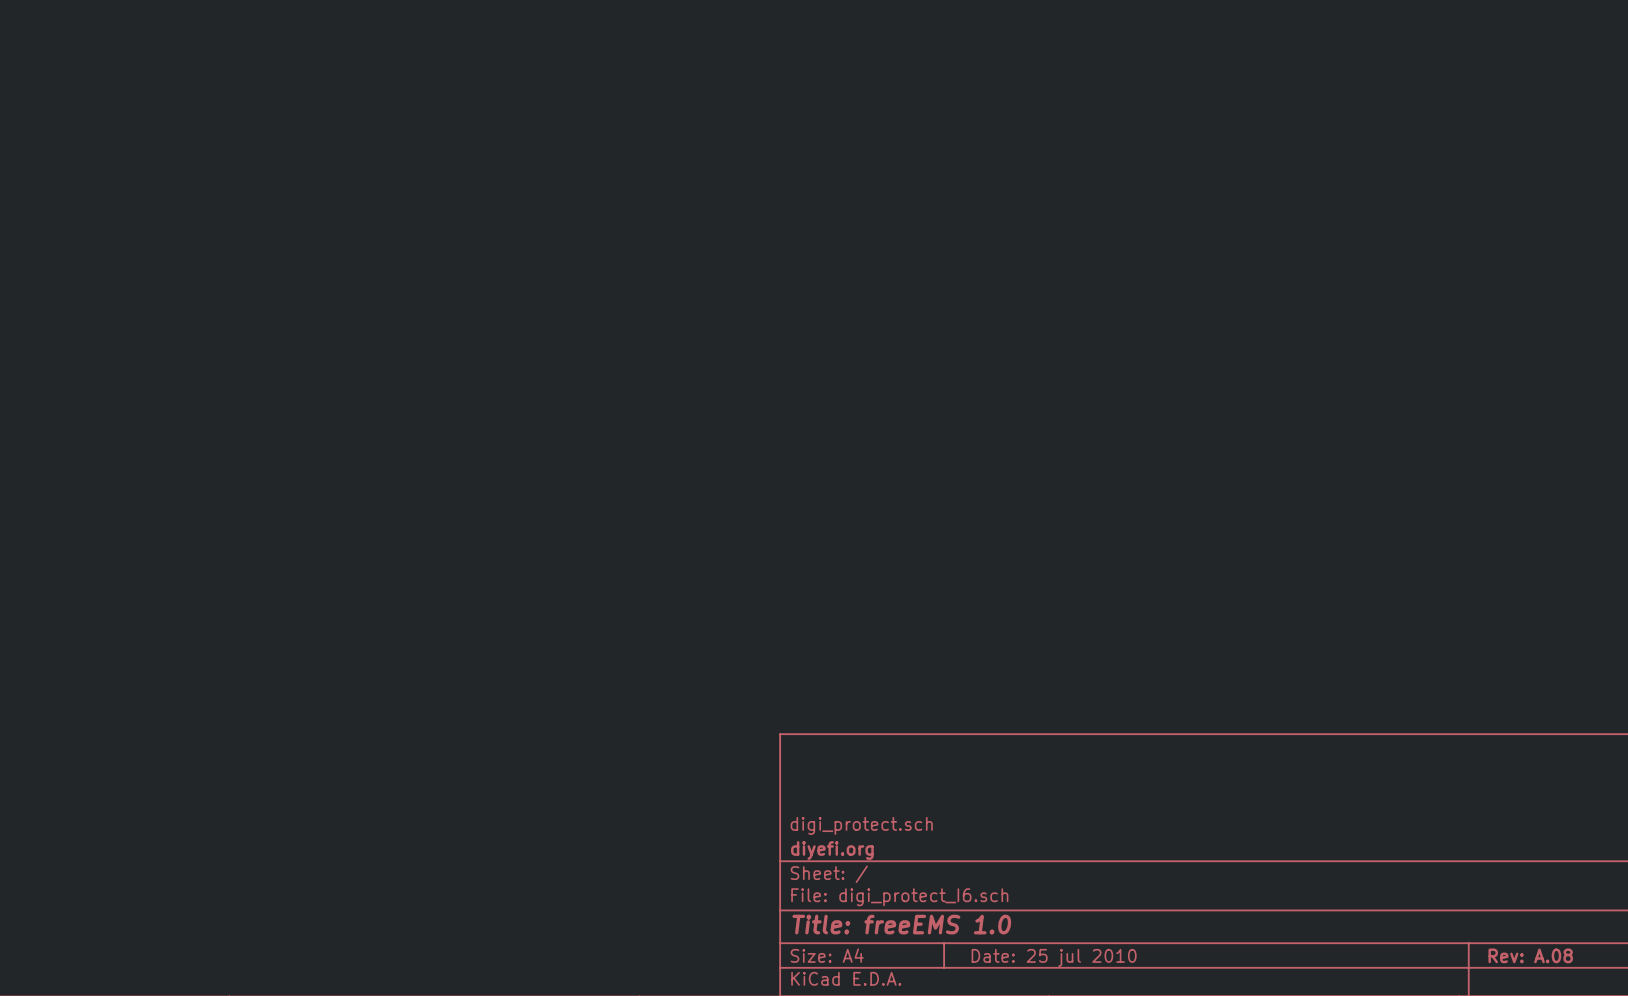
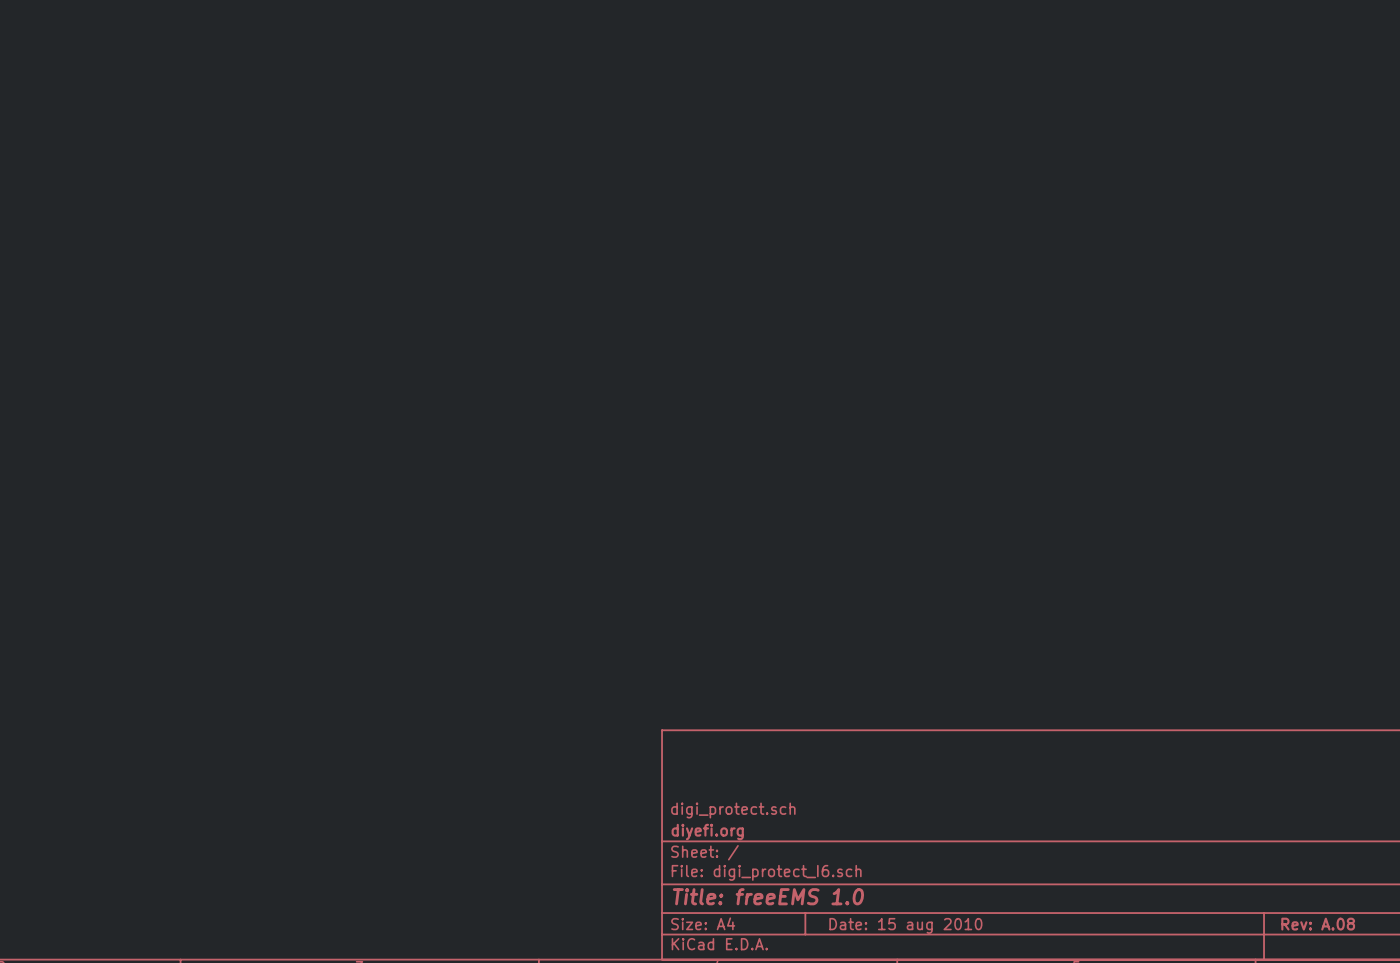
title block: Date: 25 jul 2010 (1054, 957) -> Date: 15 aug 2010 (905, 925)

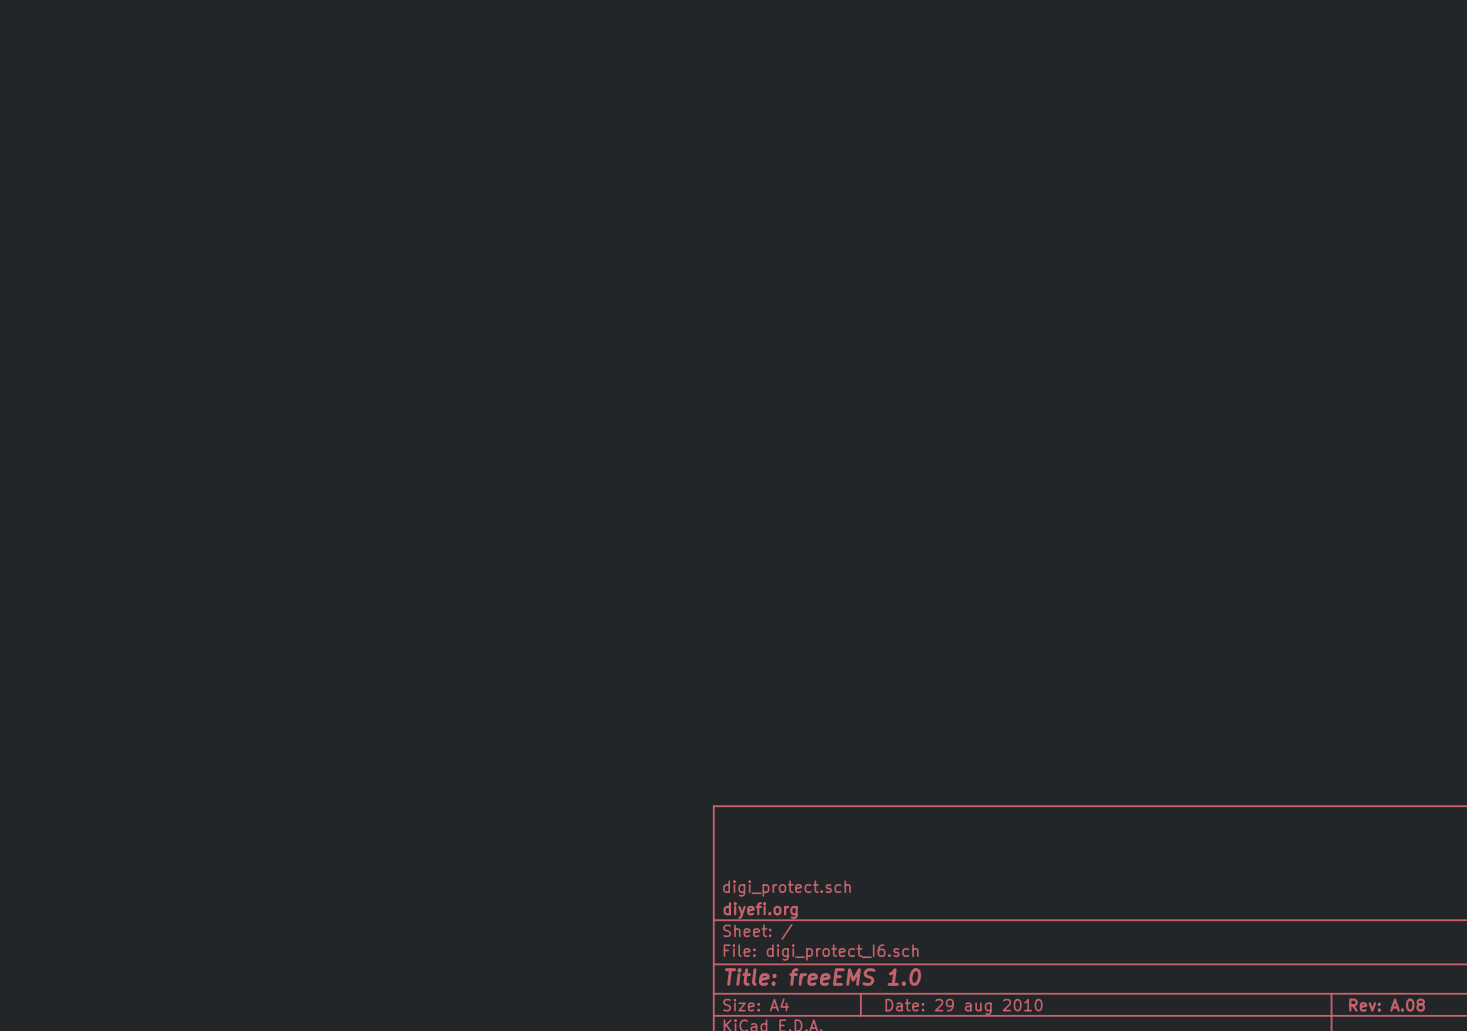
title block: Date: 15 aug 2010 (905, 925) -> Date: 29 aug 2010 (964, 1006)

